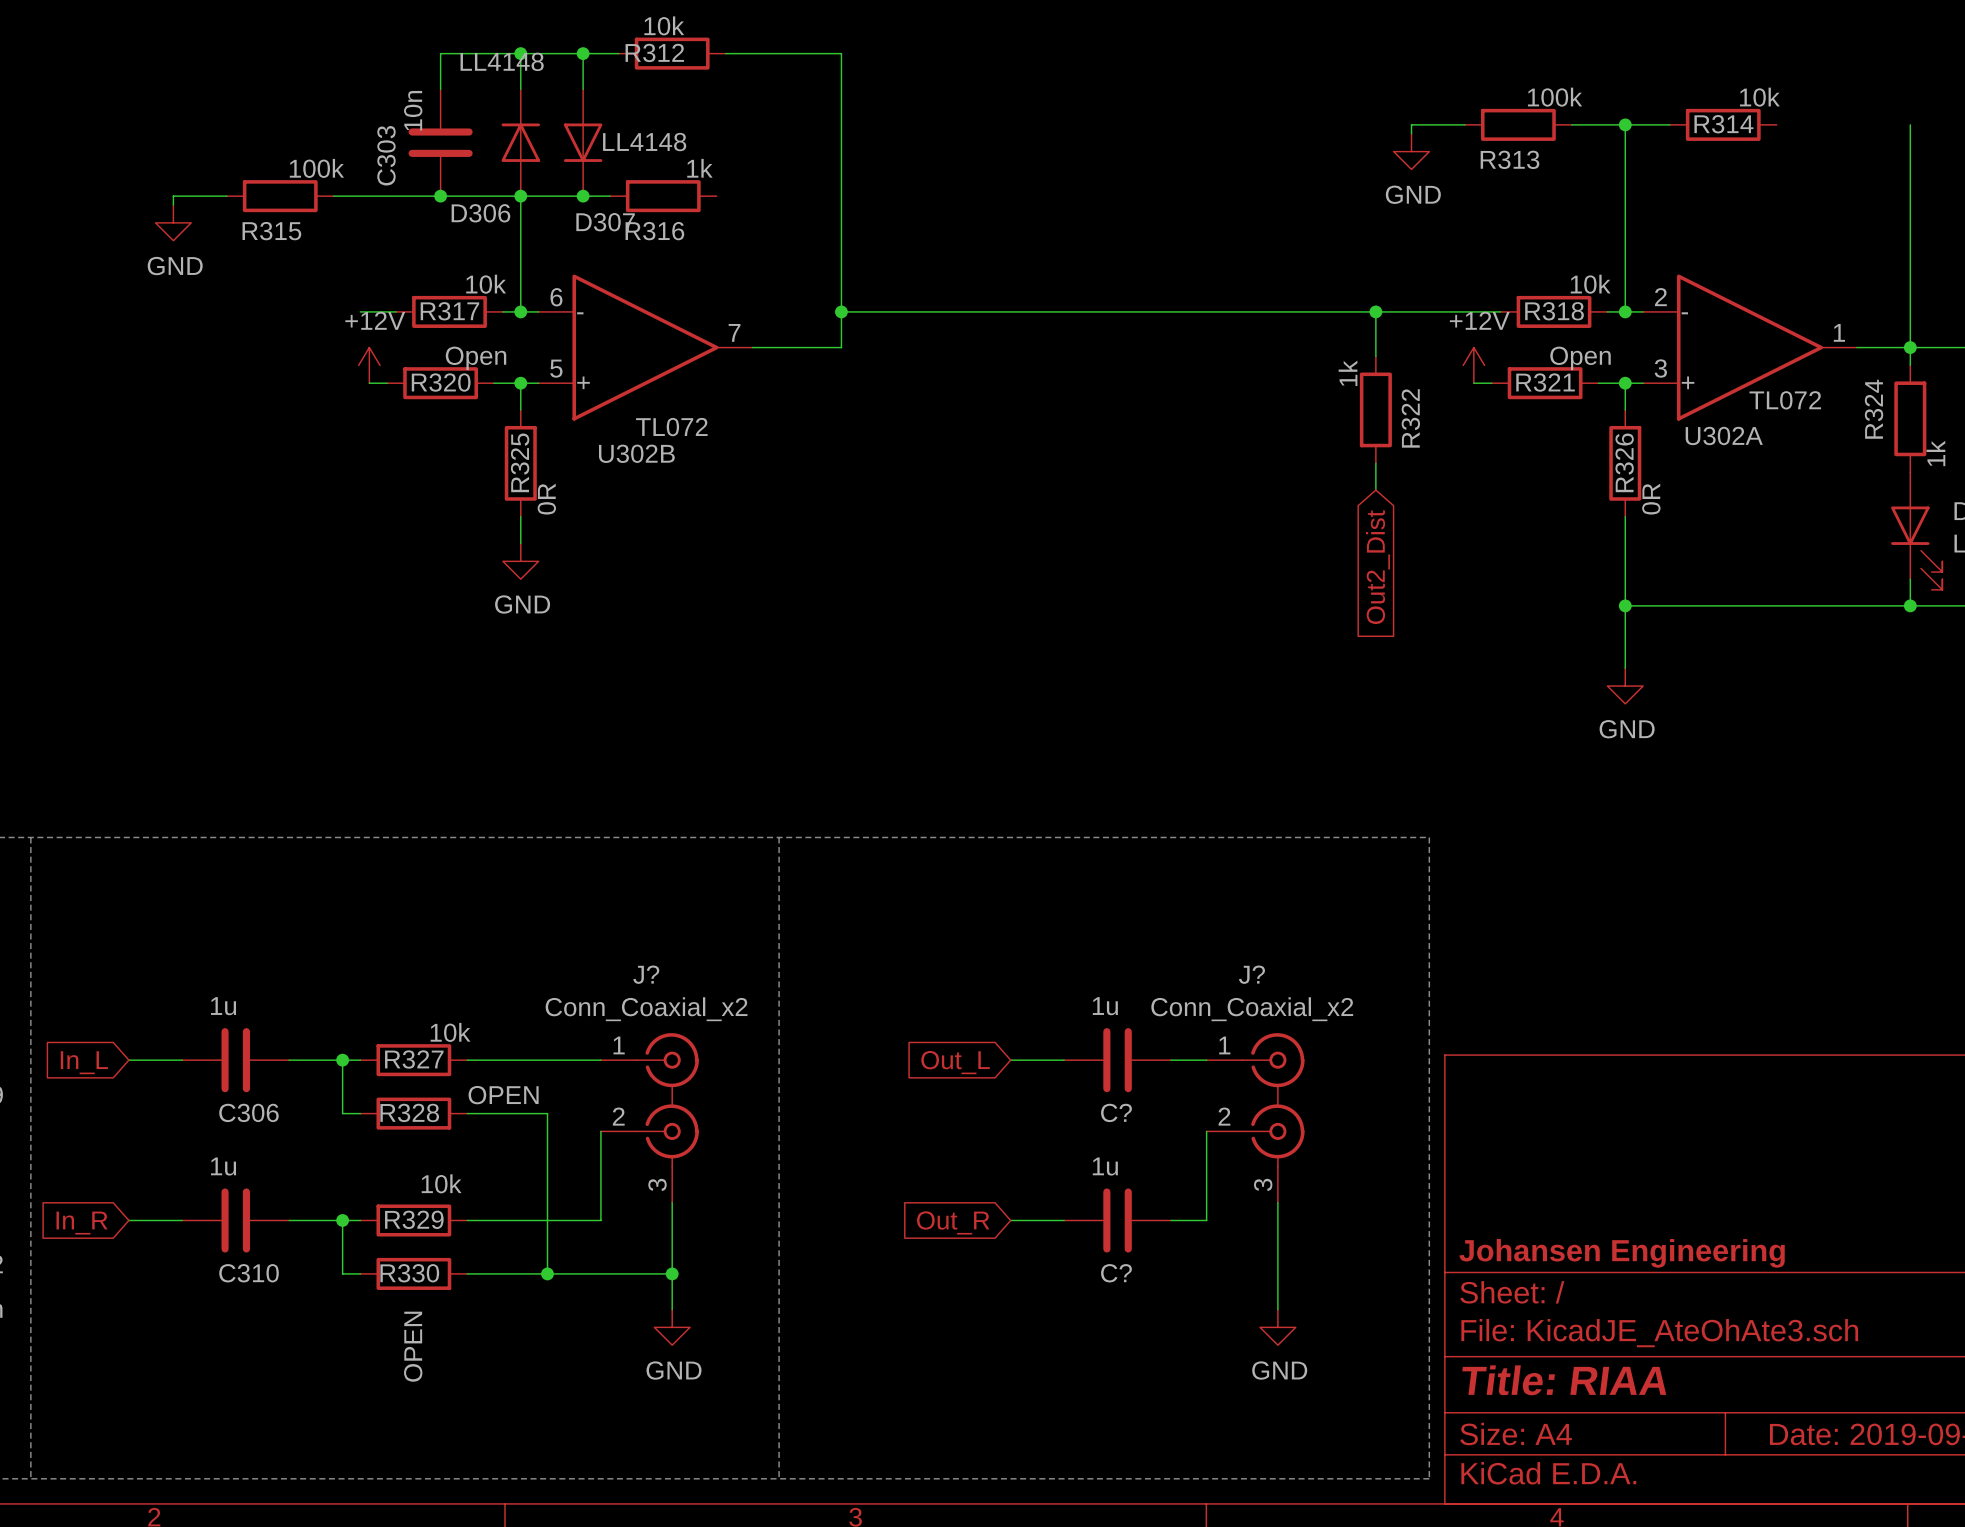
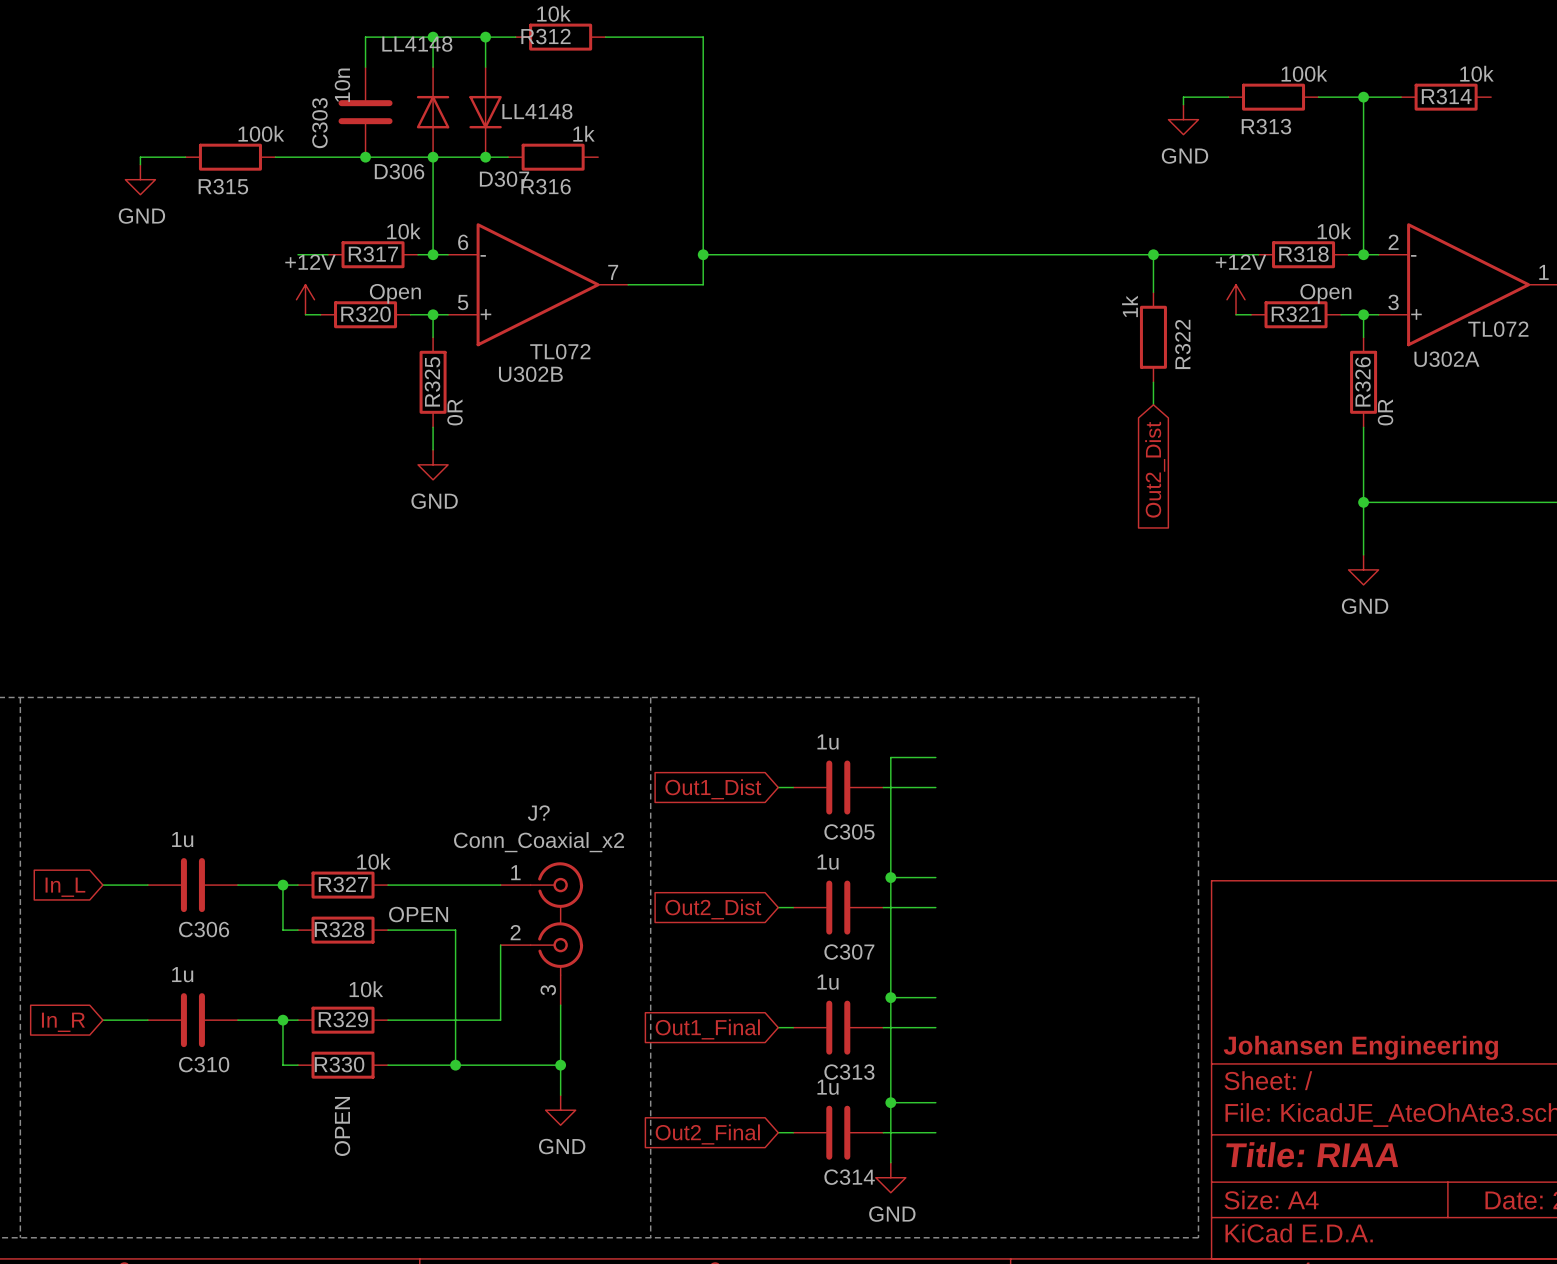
wire: none -> (935, 757) (890, 757) (890, 1162)
wire: none -> (778, 787) (793, 787)
C305: none -> 1u (838, 787)
wire: none -> (883, 787) (935, 787)
global label: none -> Out1_Dist (713, 789)
junction: none -> (890, 877)
wire: (1010, 1060) (1064, 1060) -> (890, 877) (935, 877)
C?: 1u (1117, 1060) -> none
wire: (1171, 1060) (1206, 1060) -> none
global label: Out_L (955, 1062) -> none
wire: none -> (778, 907) (793, 907)
C307: none -> 1u (838, 907)
wire: none -> (883, 907) (935, 907)
global label: none -> Out2_Dist (713, 909)
J?: Conn_Coaxial_x2 (1255, 1117) -> none
wire: (1206, 1131) (1206, 1220) (1171, 1220) -> none
junction: none -> (890, 997)
wire: (1277, 1202) (1277, 1309) -> none
wire: (1010, 1220) (1064, 1220) -> (890, 997) (935, 997)
C?: 1u (1117, 1220) -> none
global label: Out_R (953, 1222) -> none
wire: none -> (778, 1027) (793, 1027)
C313: none -> 1u (838, 1027)
wire: none -> (883, 1027) (935, 1027)
global label: none -> Out1_Final (707, 1029)
wire: none -> (890, 1102) (935, 1102)
junction: none -> (890, 1102)
power symbol position: GND (1277, 1327) -> GND (890, 1177)
wire: none -> (778, 1132) (793, 1132)
C314: none -> 1u (838, 1132)
wire: none -> (883, 1132) (935, 1132)
global label: none -> Out2_Final (707, 1134)

